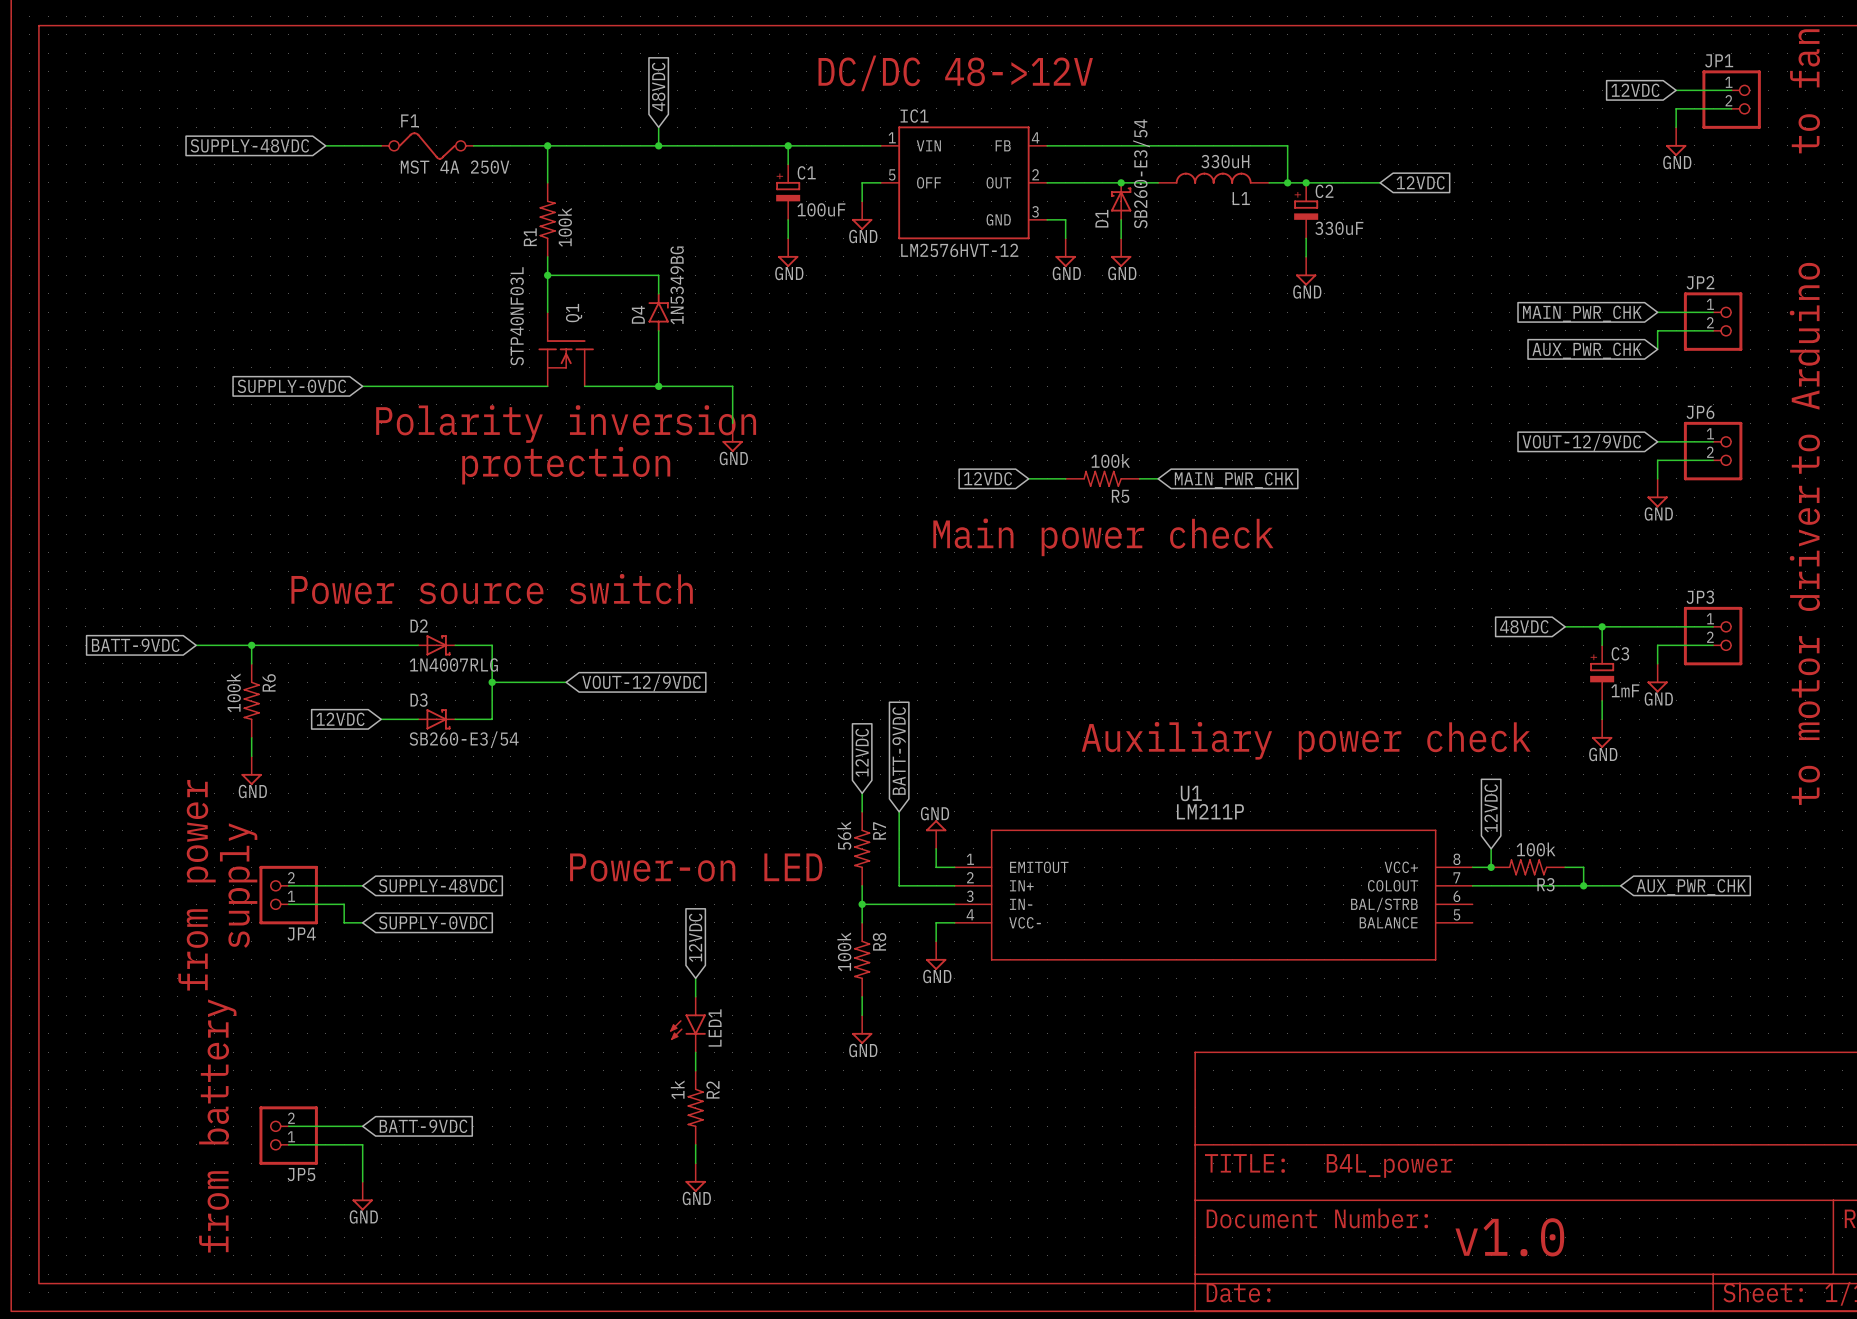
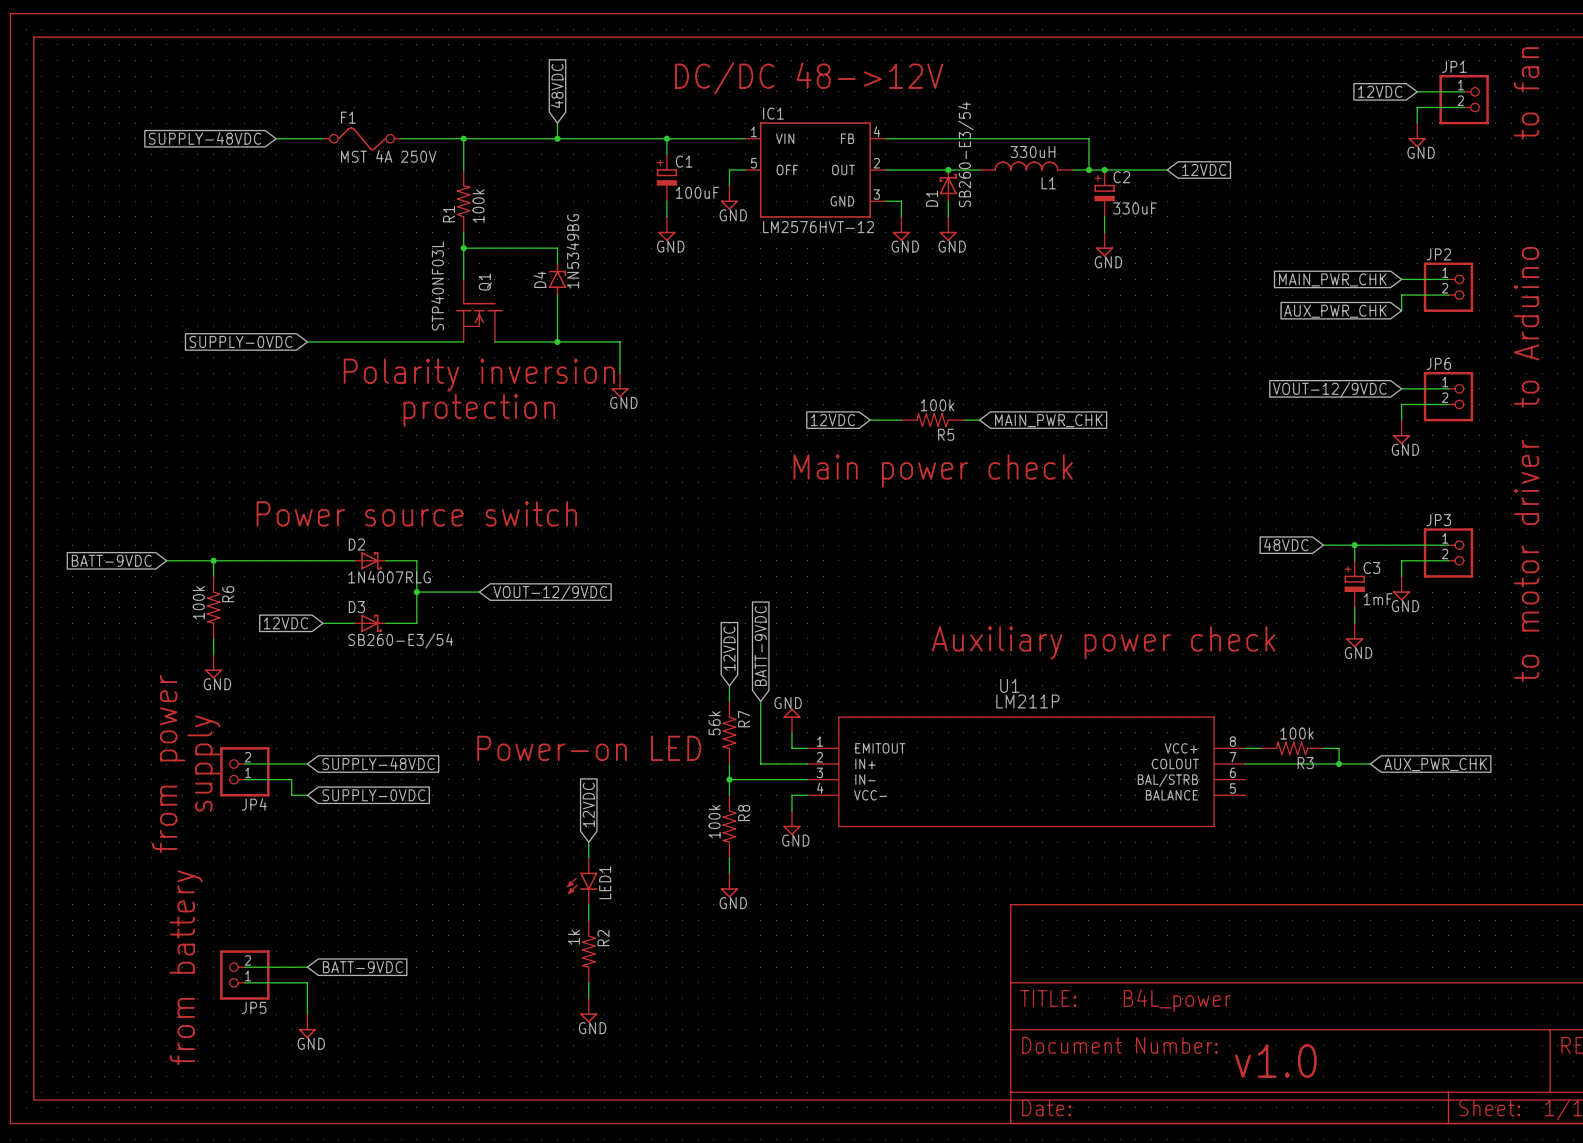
global label: 12VDC (1491, 808) -> none
wire: (1491, 848) (1491, 867) -> none
junction: (1491, 867) -> none

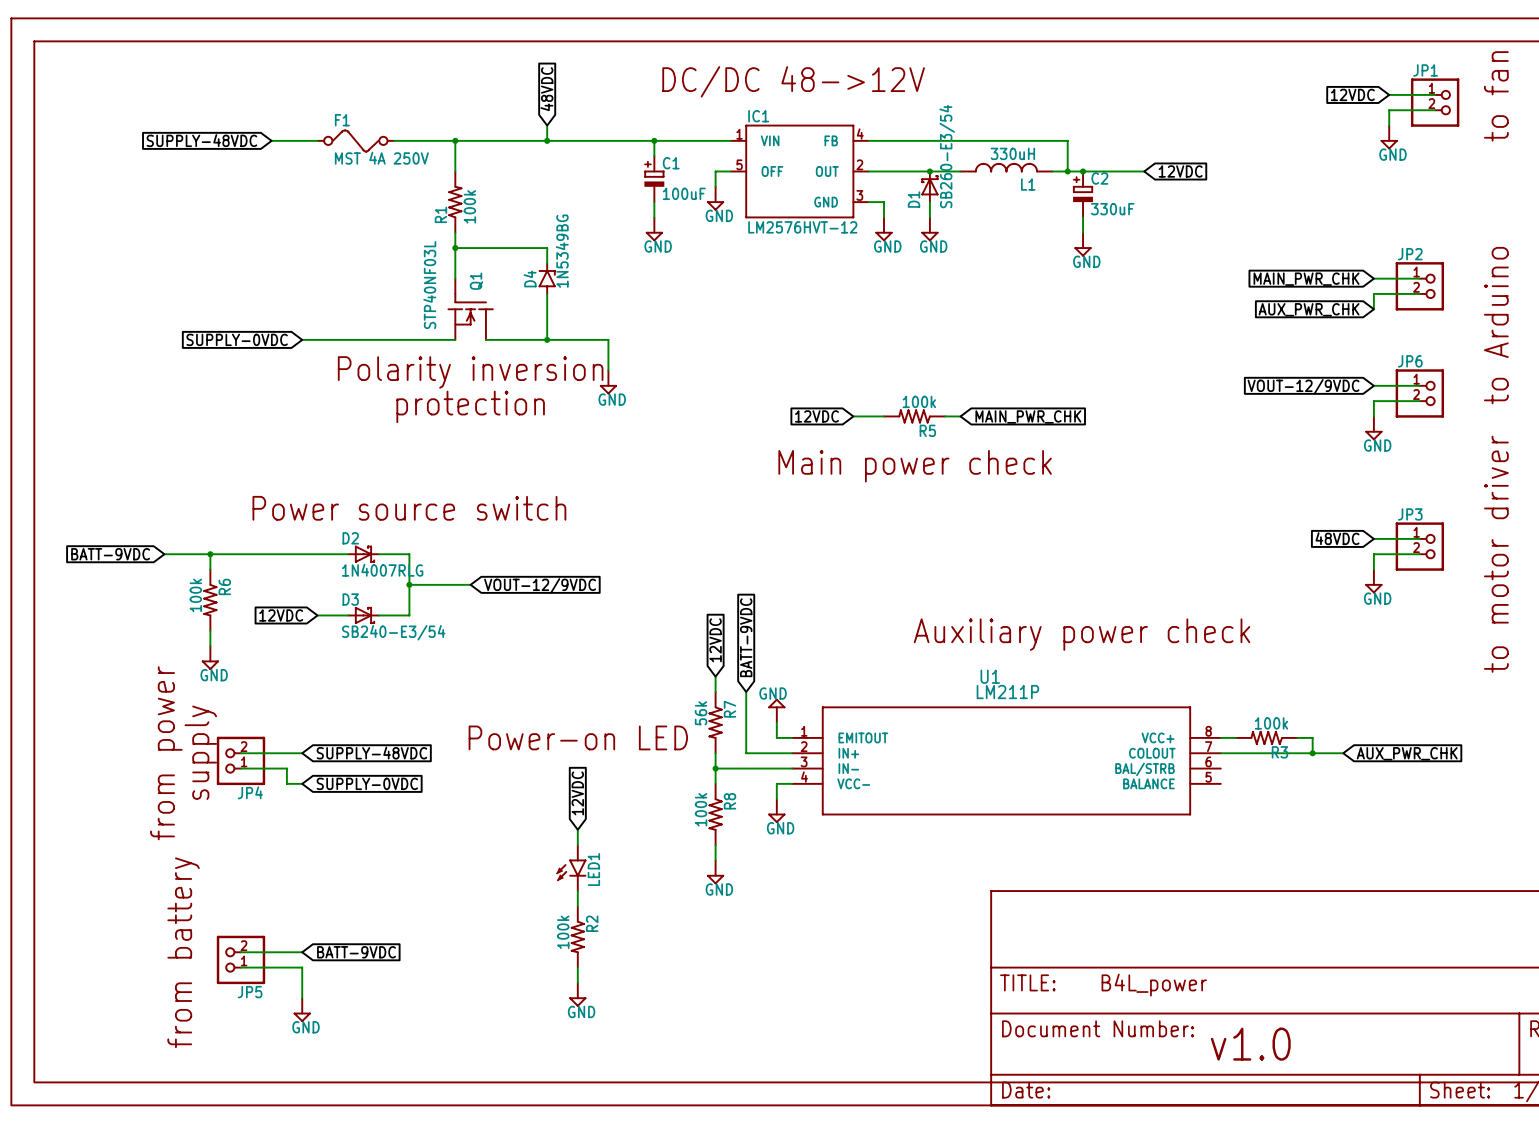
global label position: 48VDC (1286, 544) -> 48VDC (1337, 538)
wire: (1323, 545) (1401, 545) -> none
wire: (1354, 545) (1354, 560) -> none
junction: (1354, 545) -> none
C3: 1mF (1354, 584) -> none
wire: (1354, 607) (1354, 623) -> none
power symbol: GND (1354, 635) -> none
D3 value: SB260-E3/54 (400, 640) -> SB240-E3/54 (393, 632)
R2 value: 1k (573, 937) -> 100k (563, 932)

